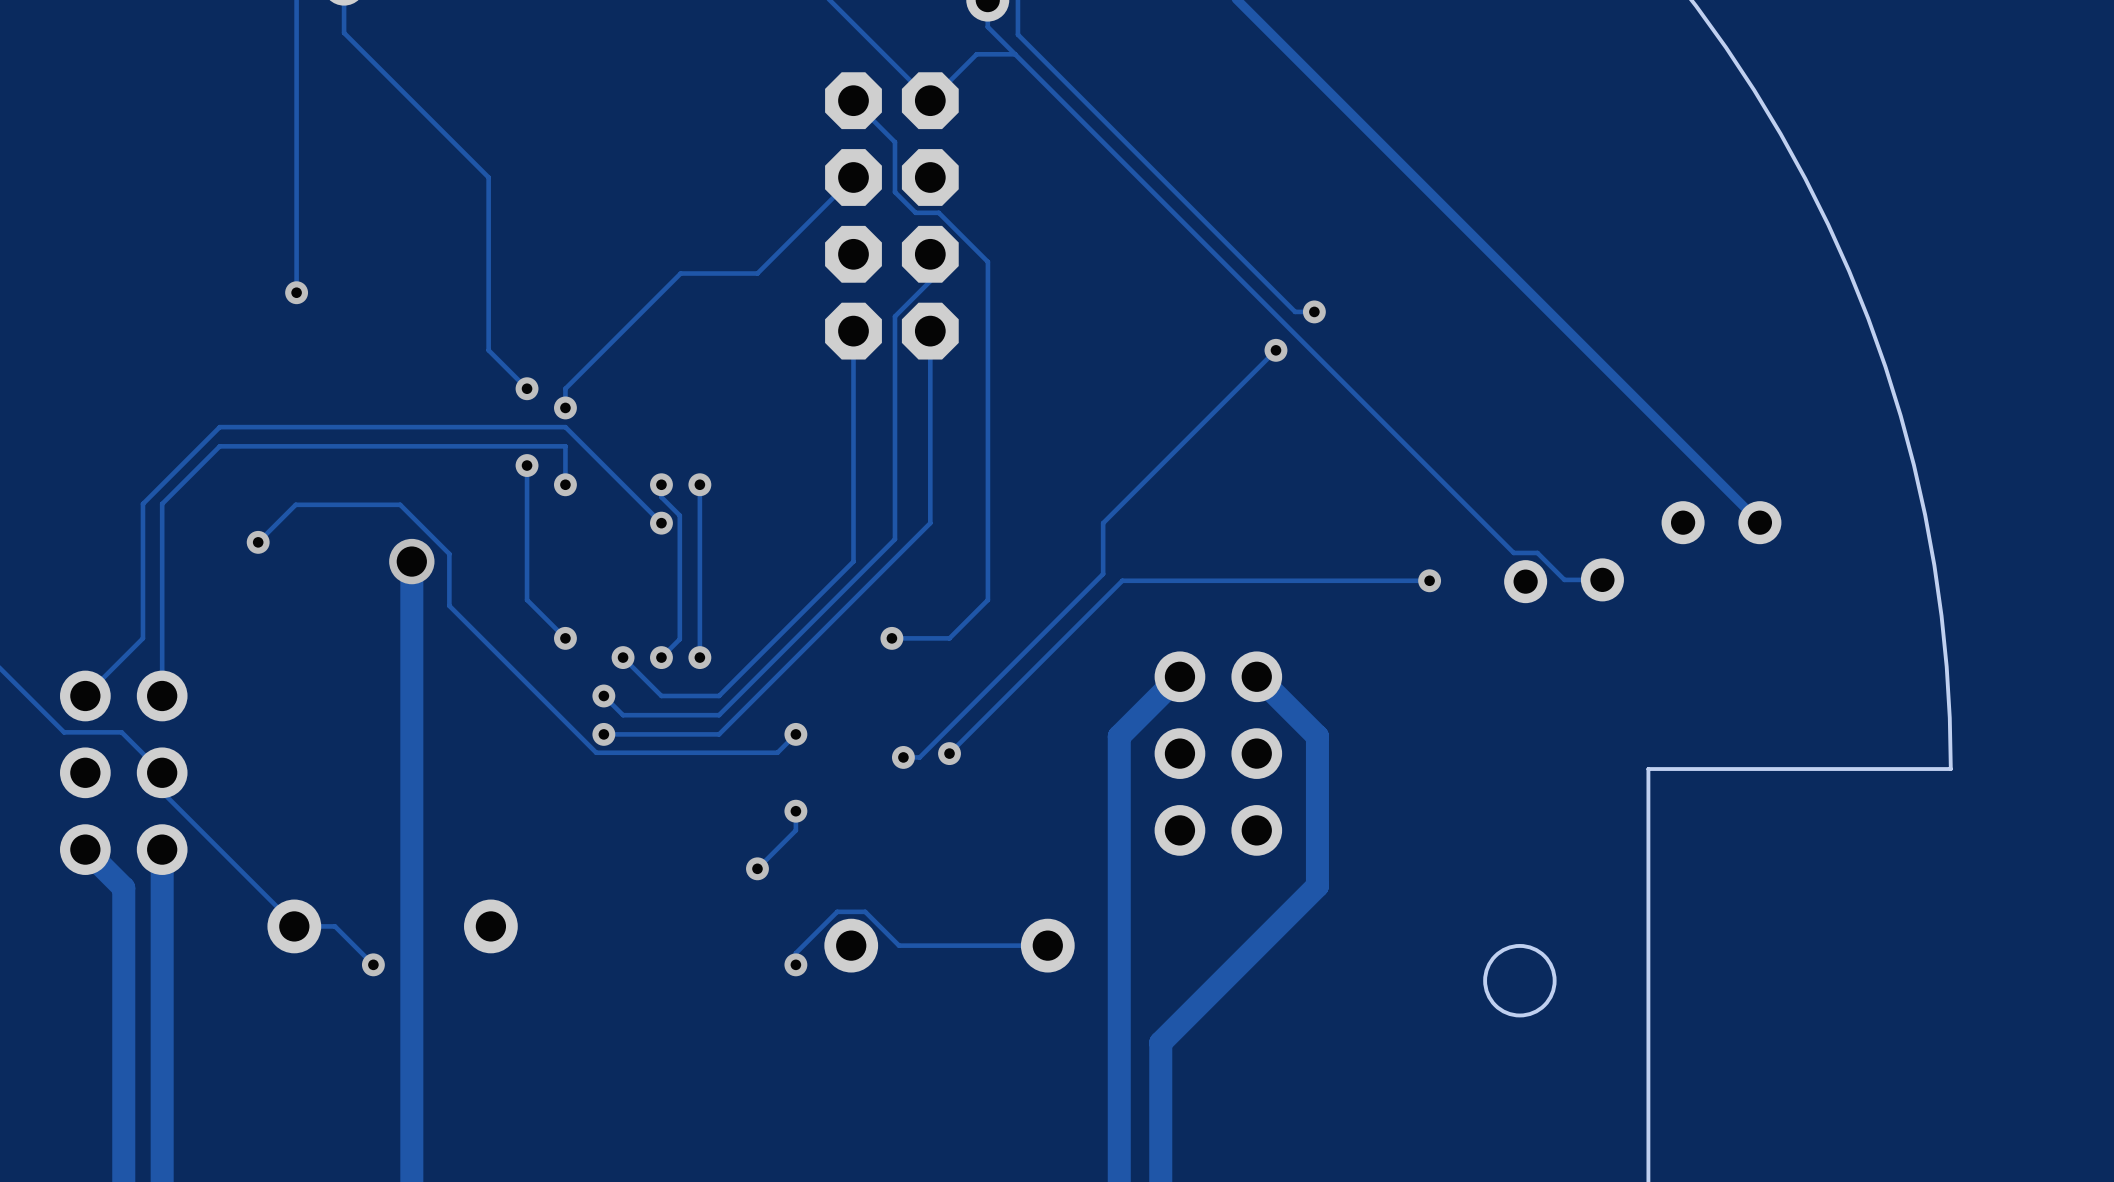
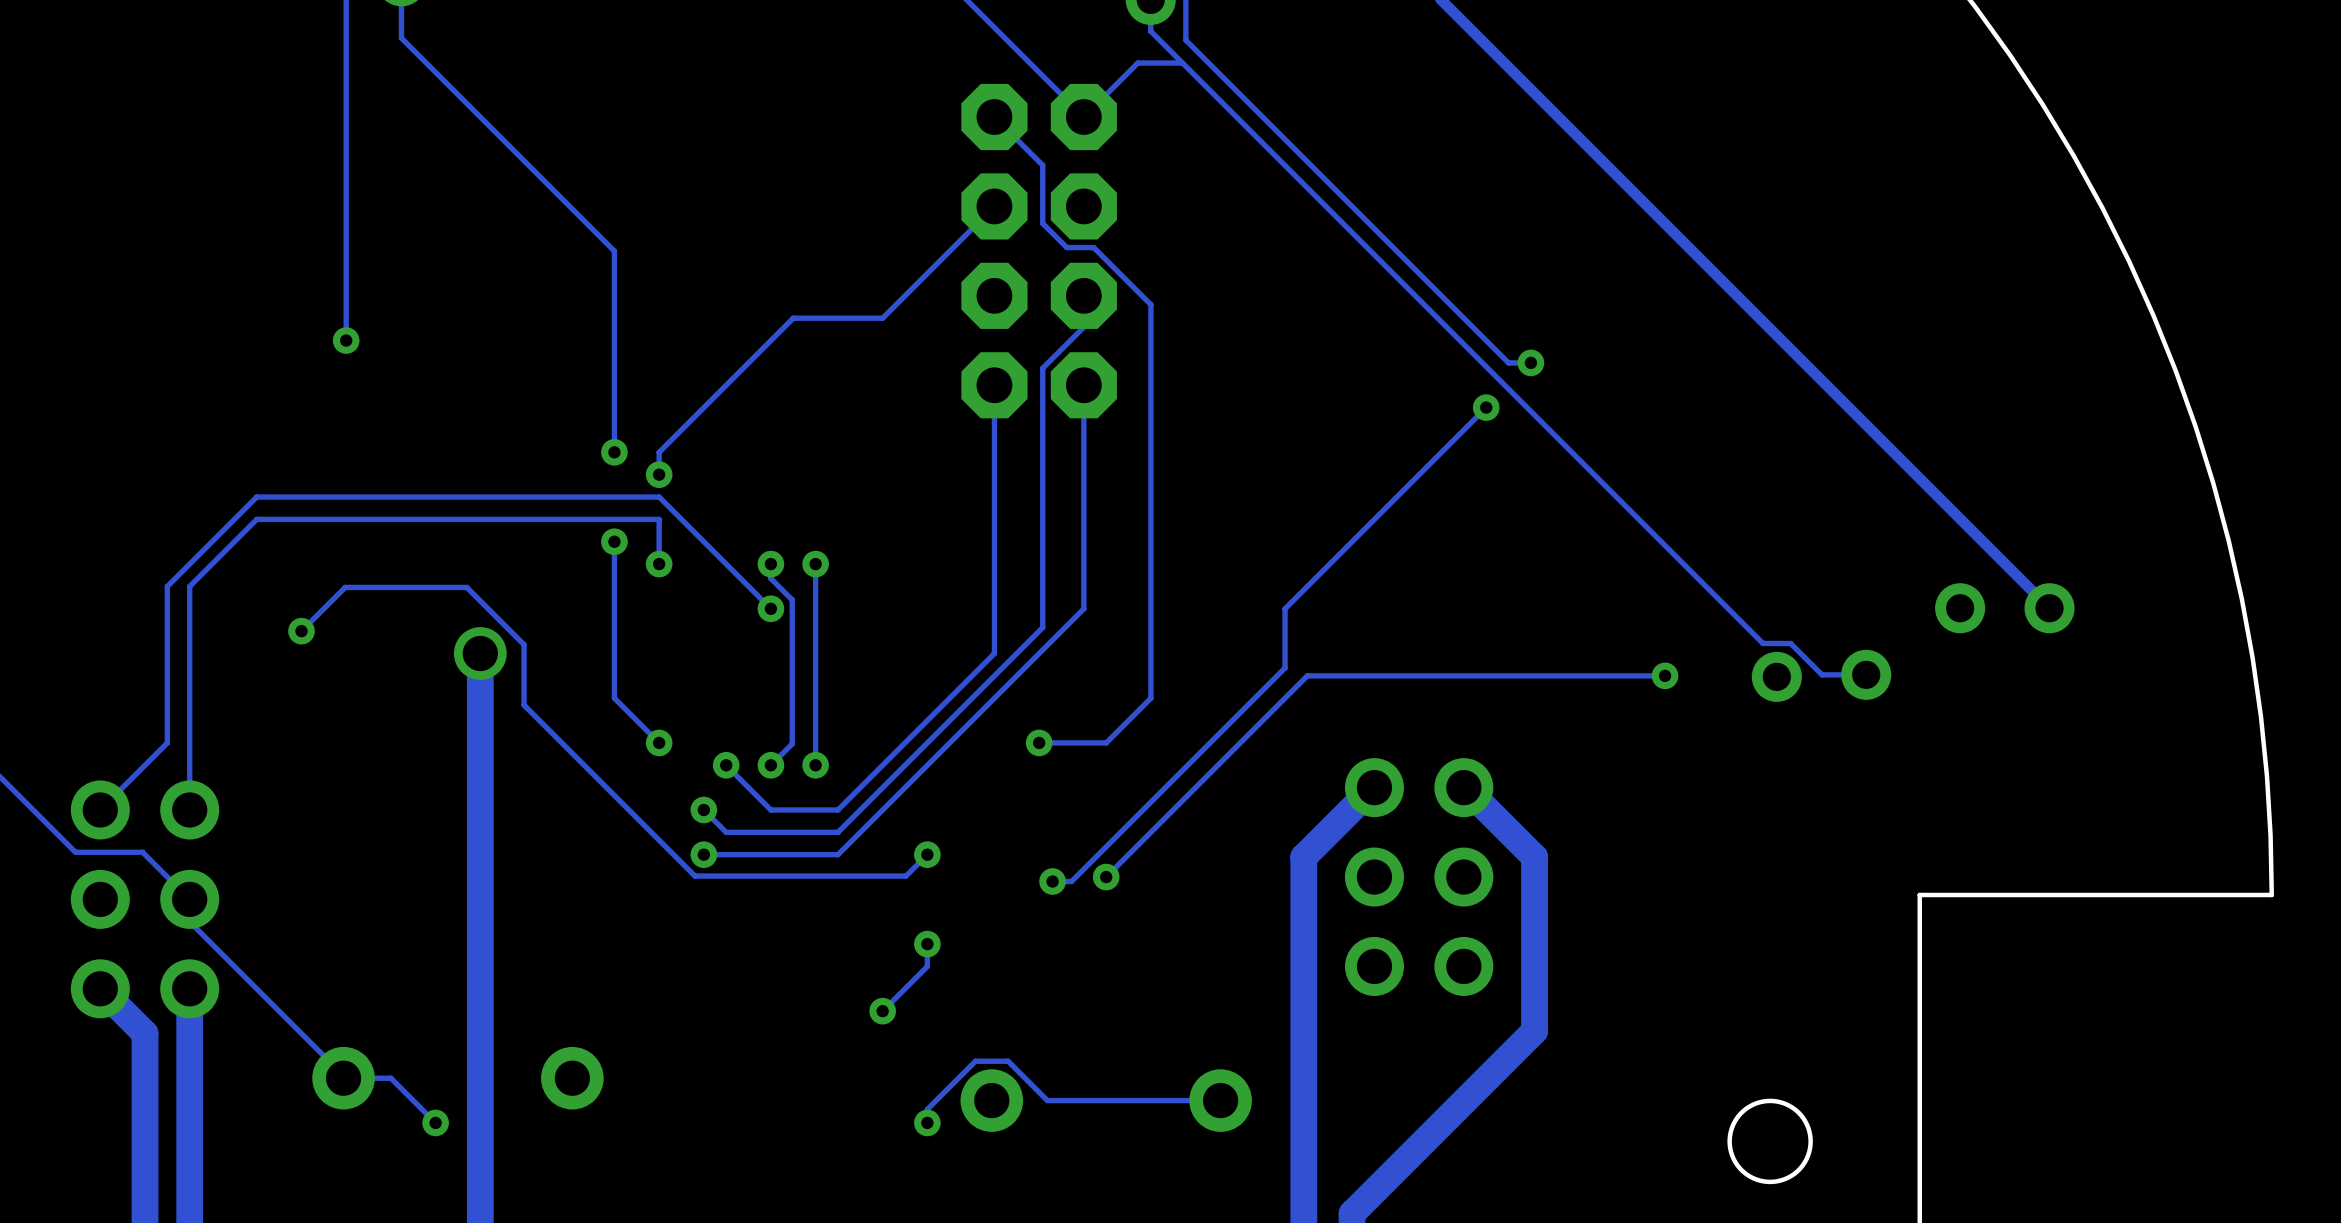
track: (488, 177) (488, 350) (527, 388) -> (569, 206) (614, 251) (614, 452)

